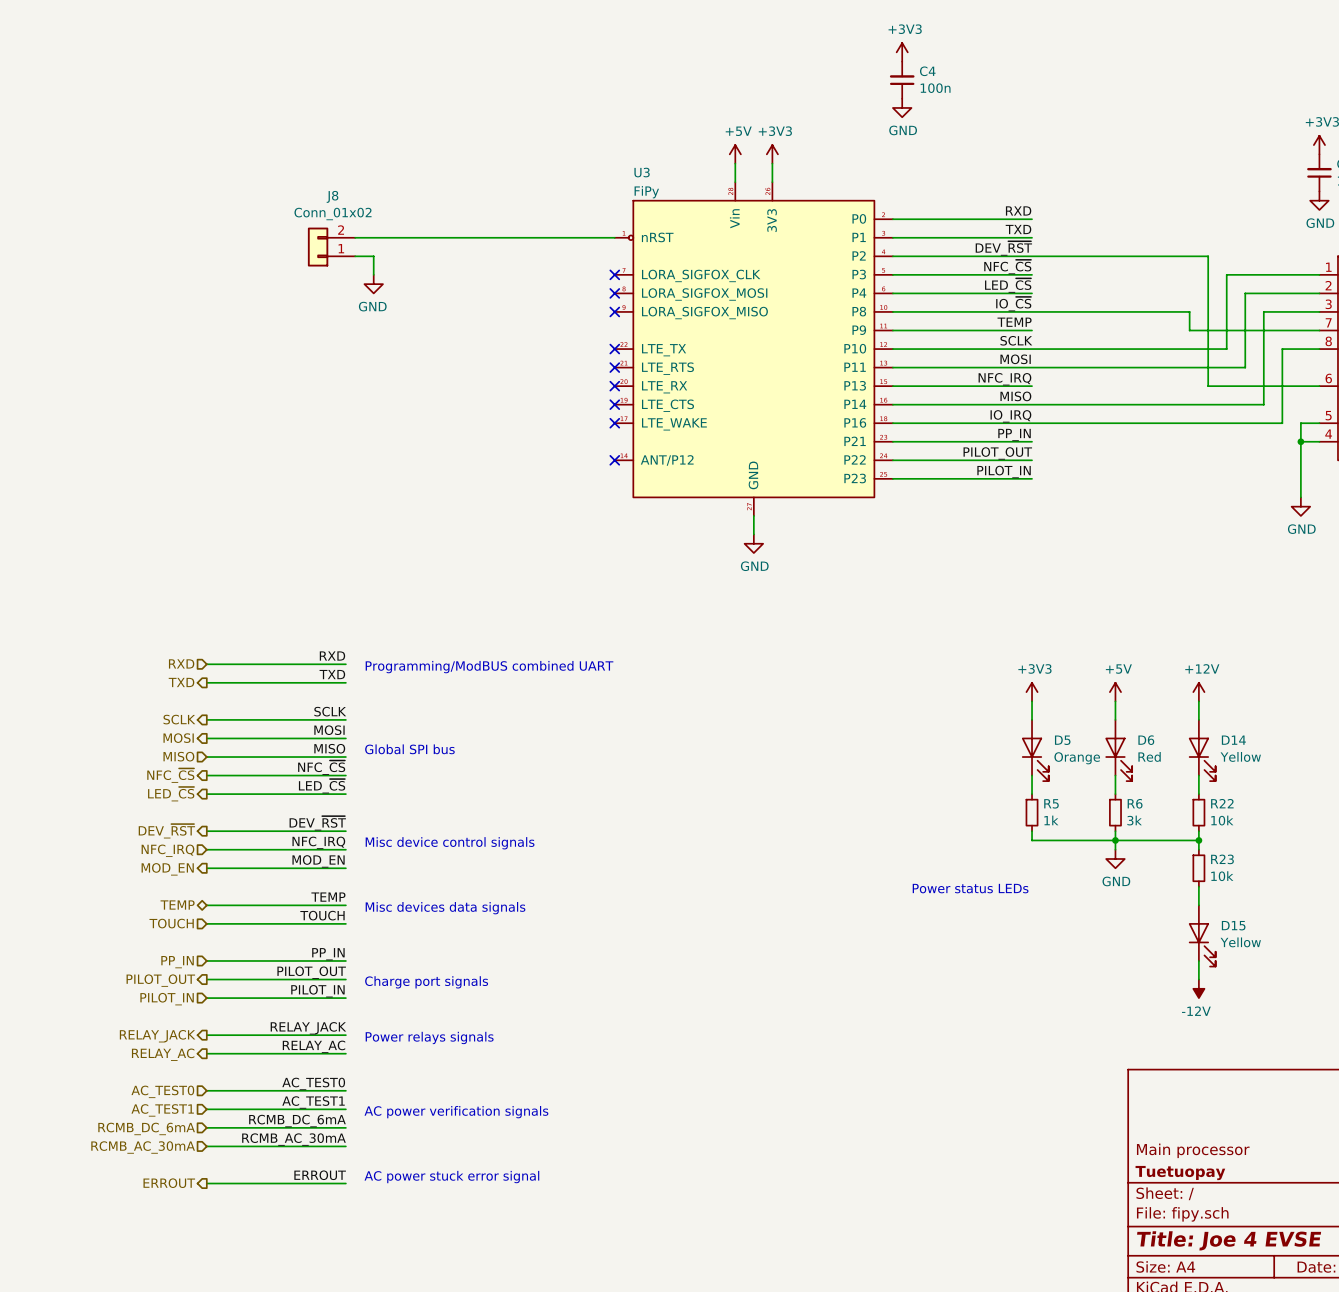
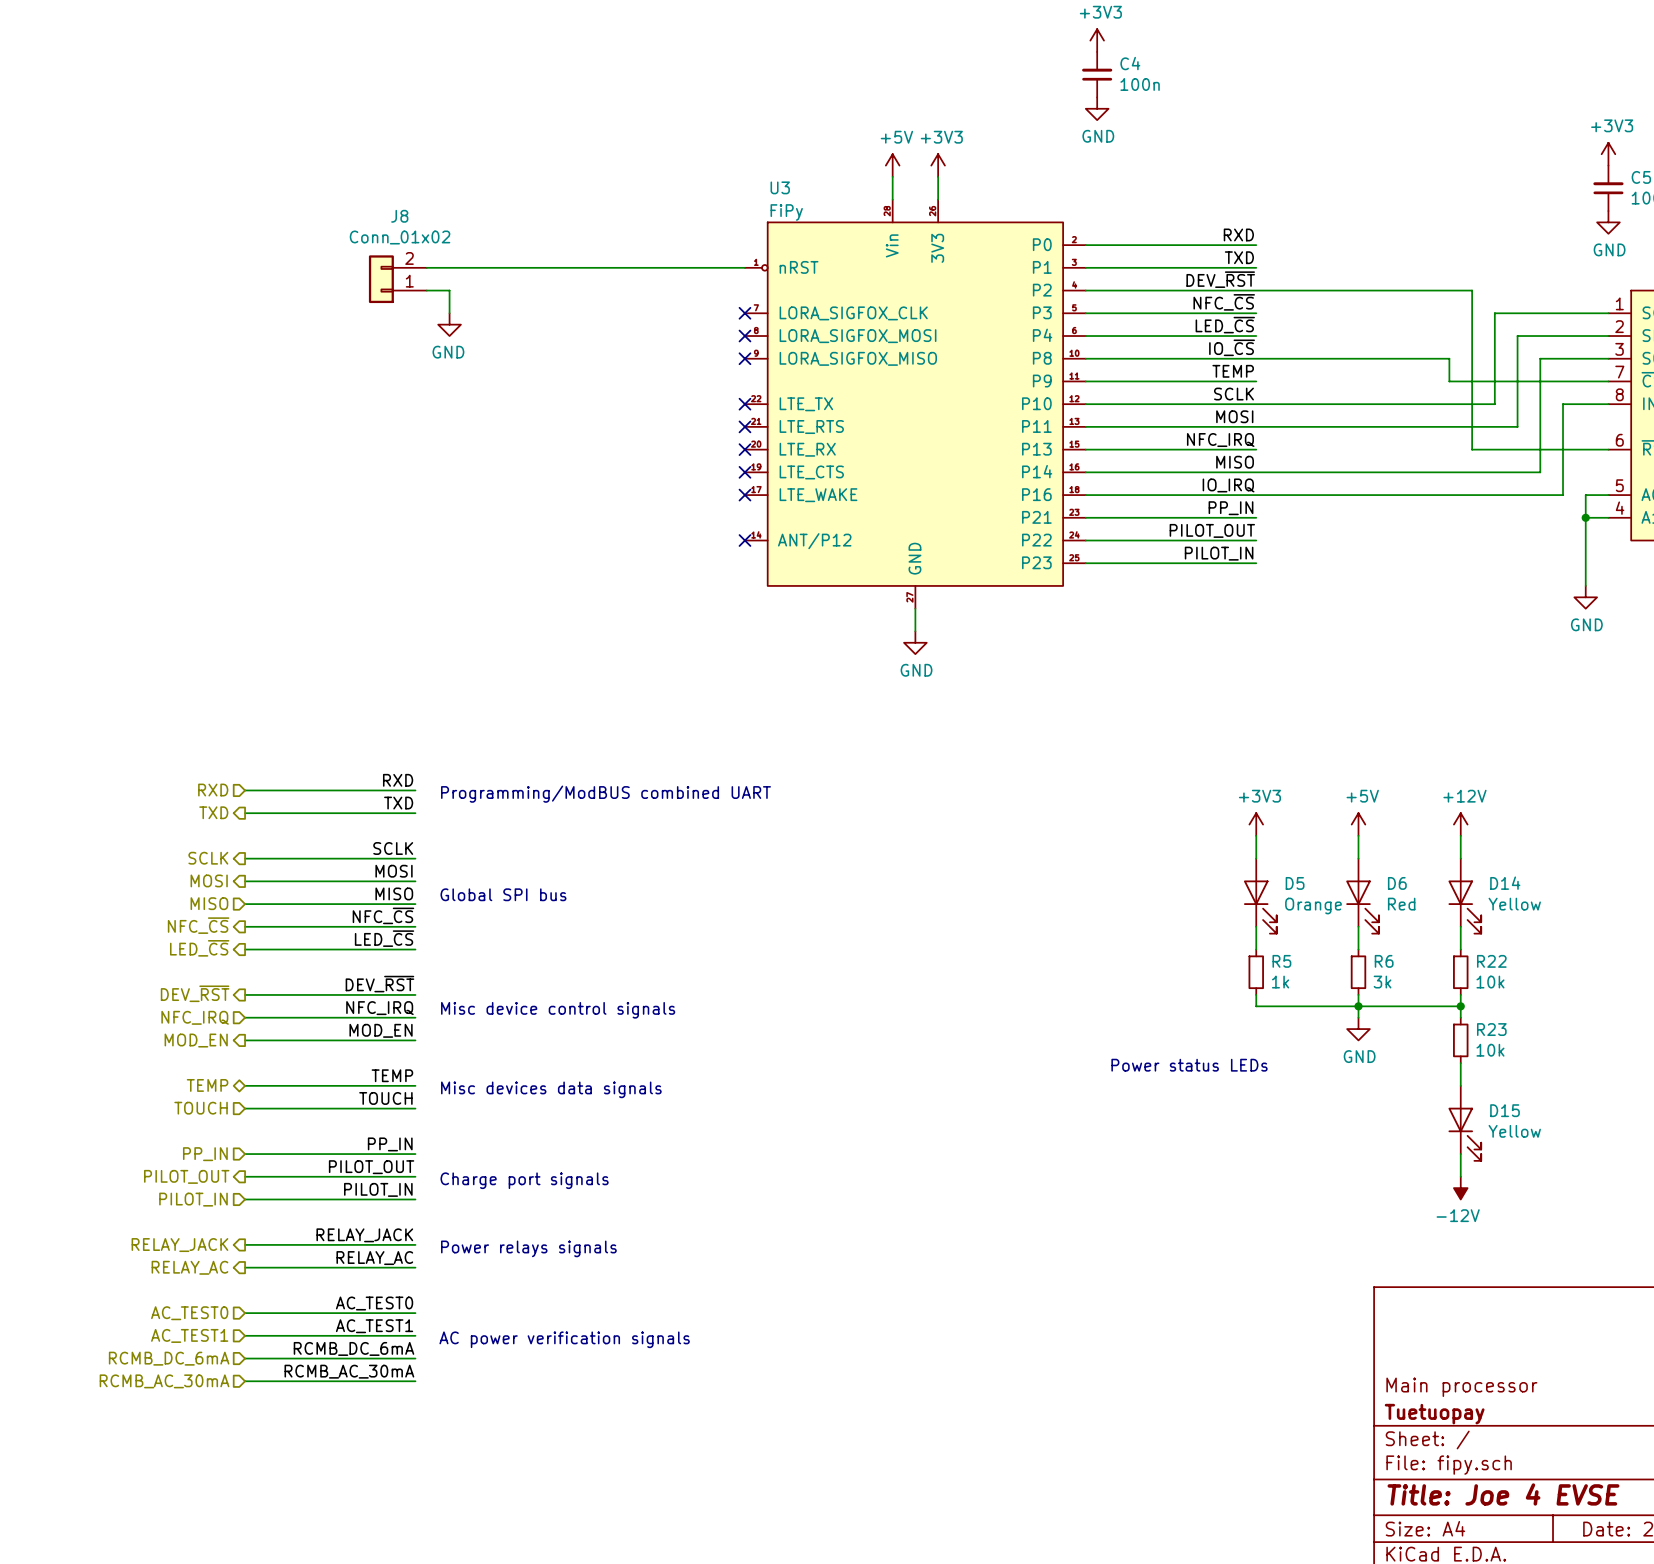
label: ERROUT (320, 1175) -> none
text: AC power stuck error signal (451, 1177) -> none
hierarchical label: ERROUT (169, 1183) -> none
wire: (206, 1183) (345, 1183) -> none

